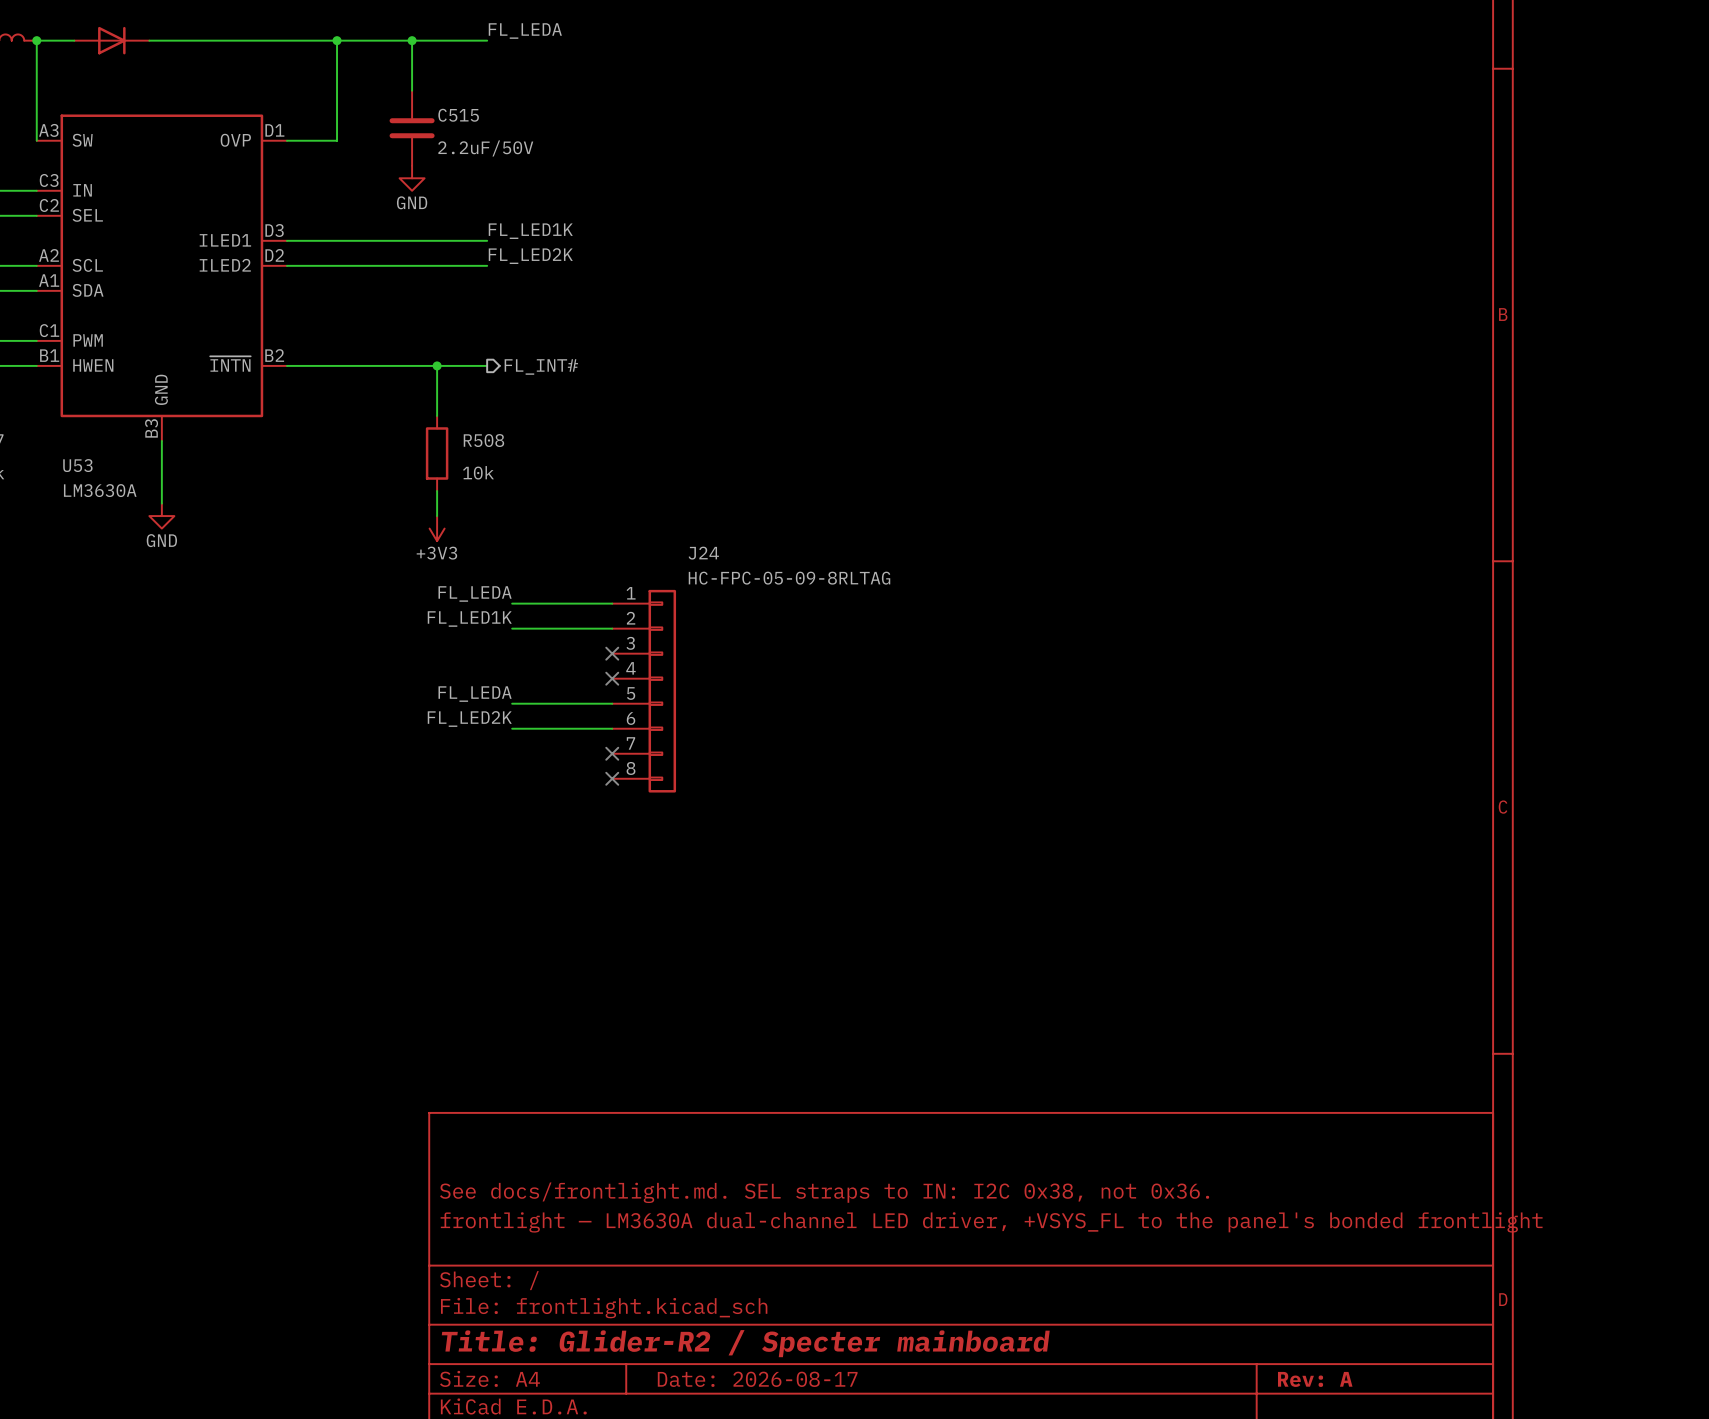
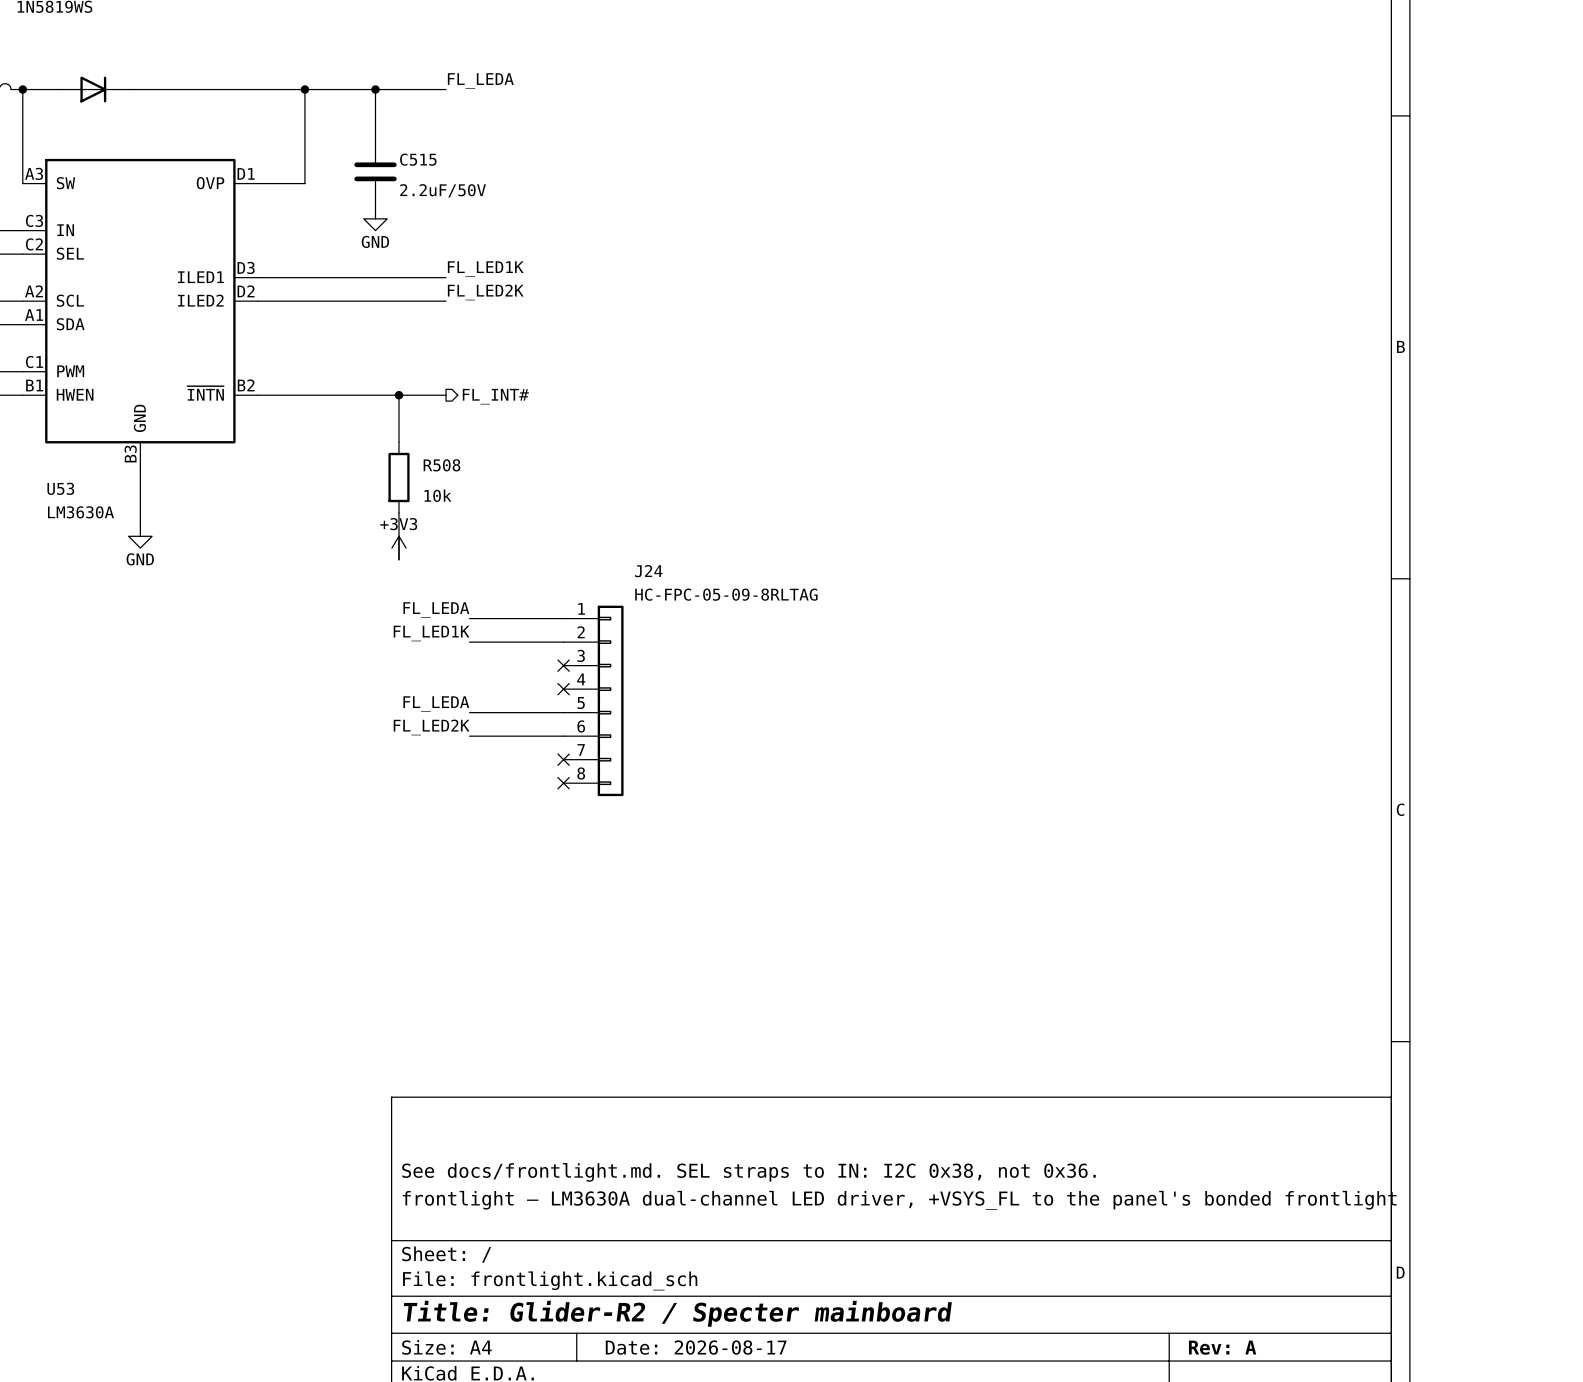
power symbol rotation: 0° (437, 528) -> 180° (399, 548)

